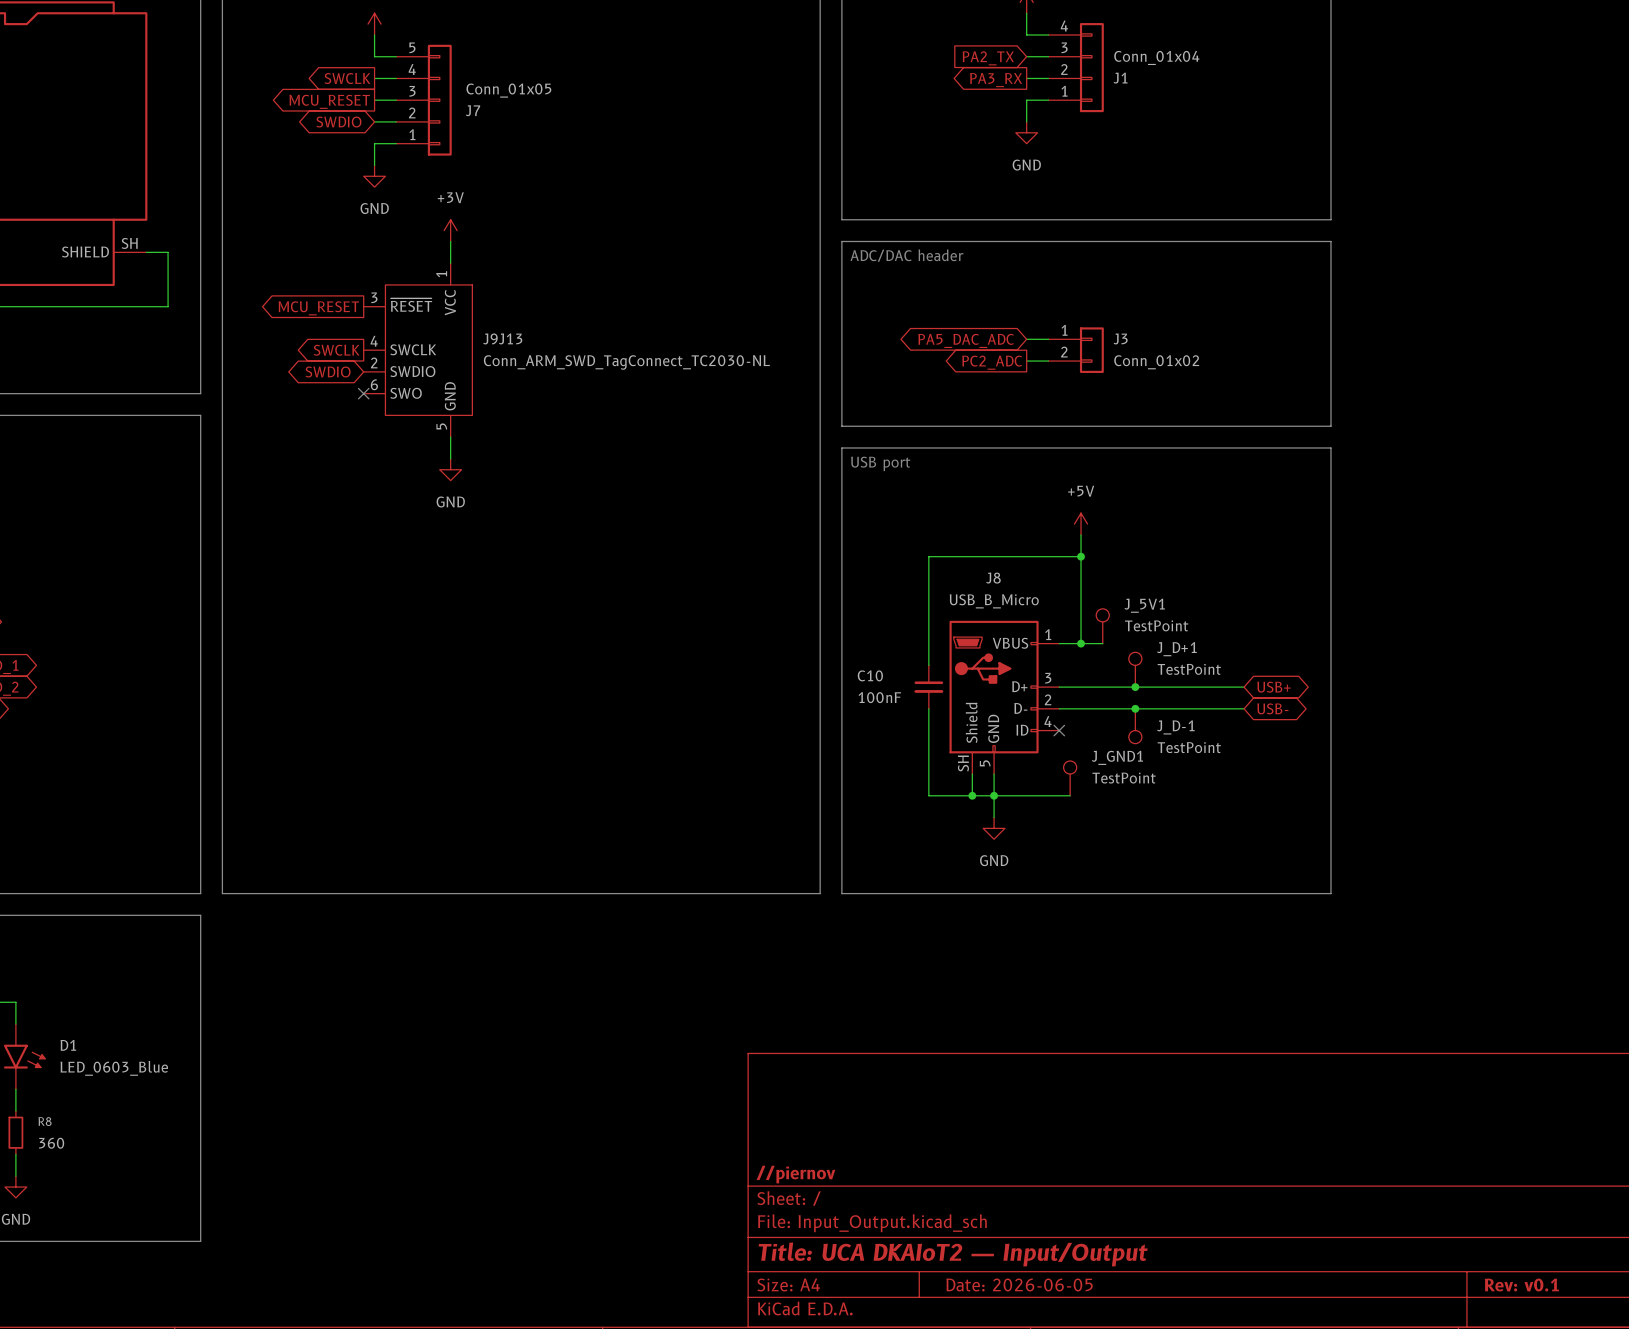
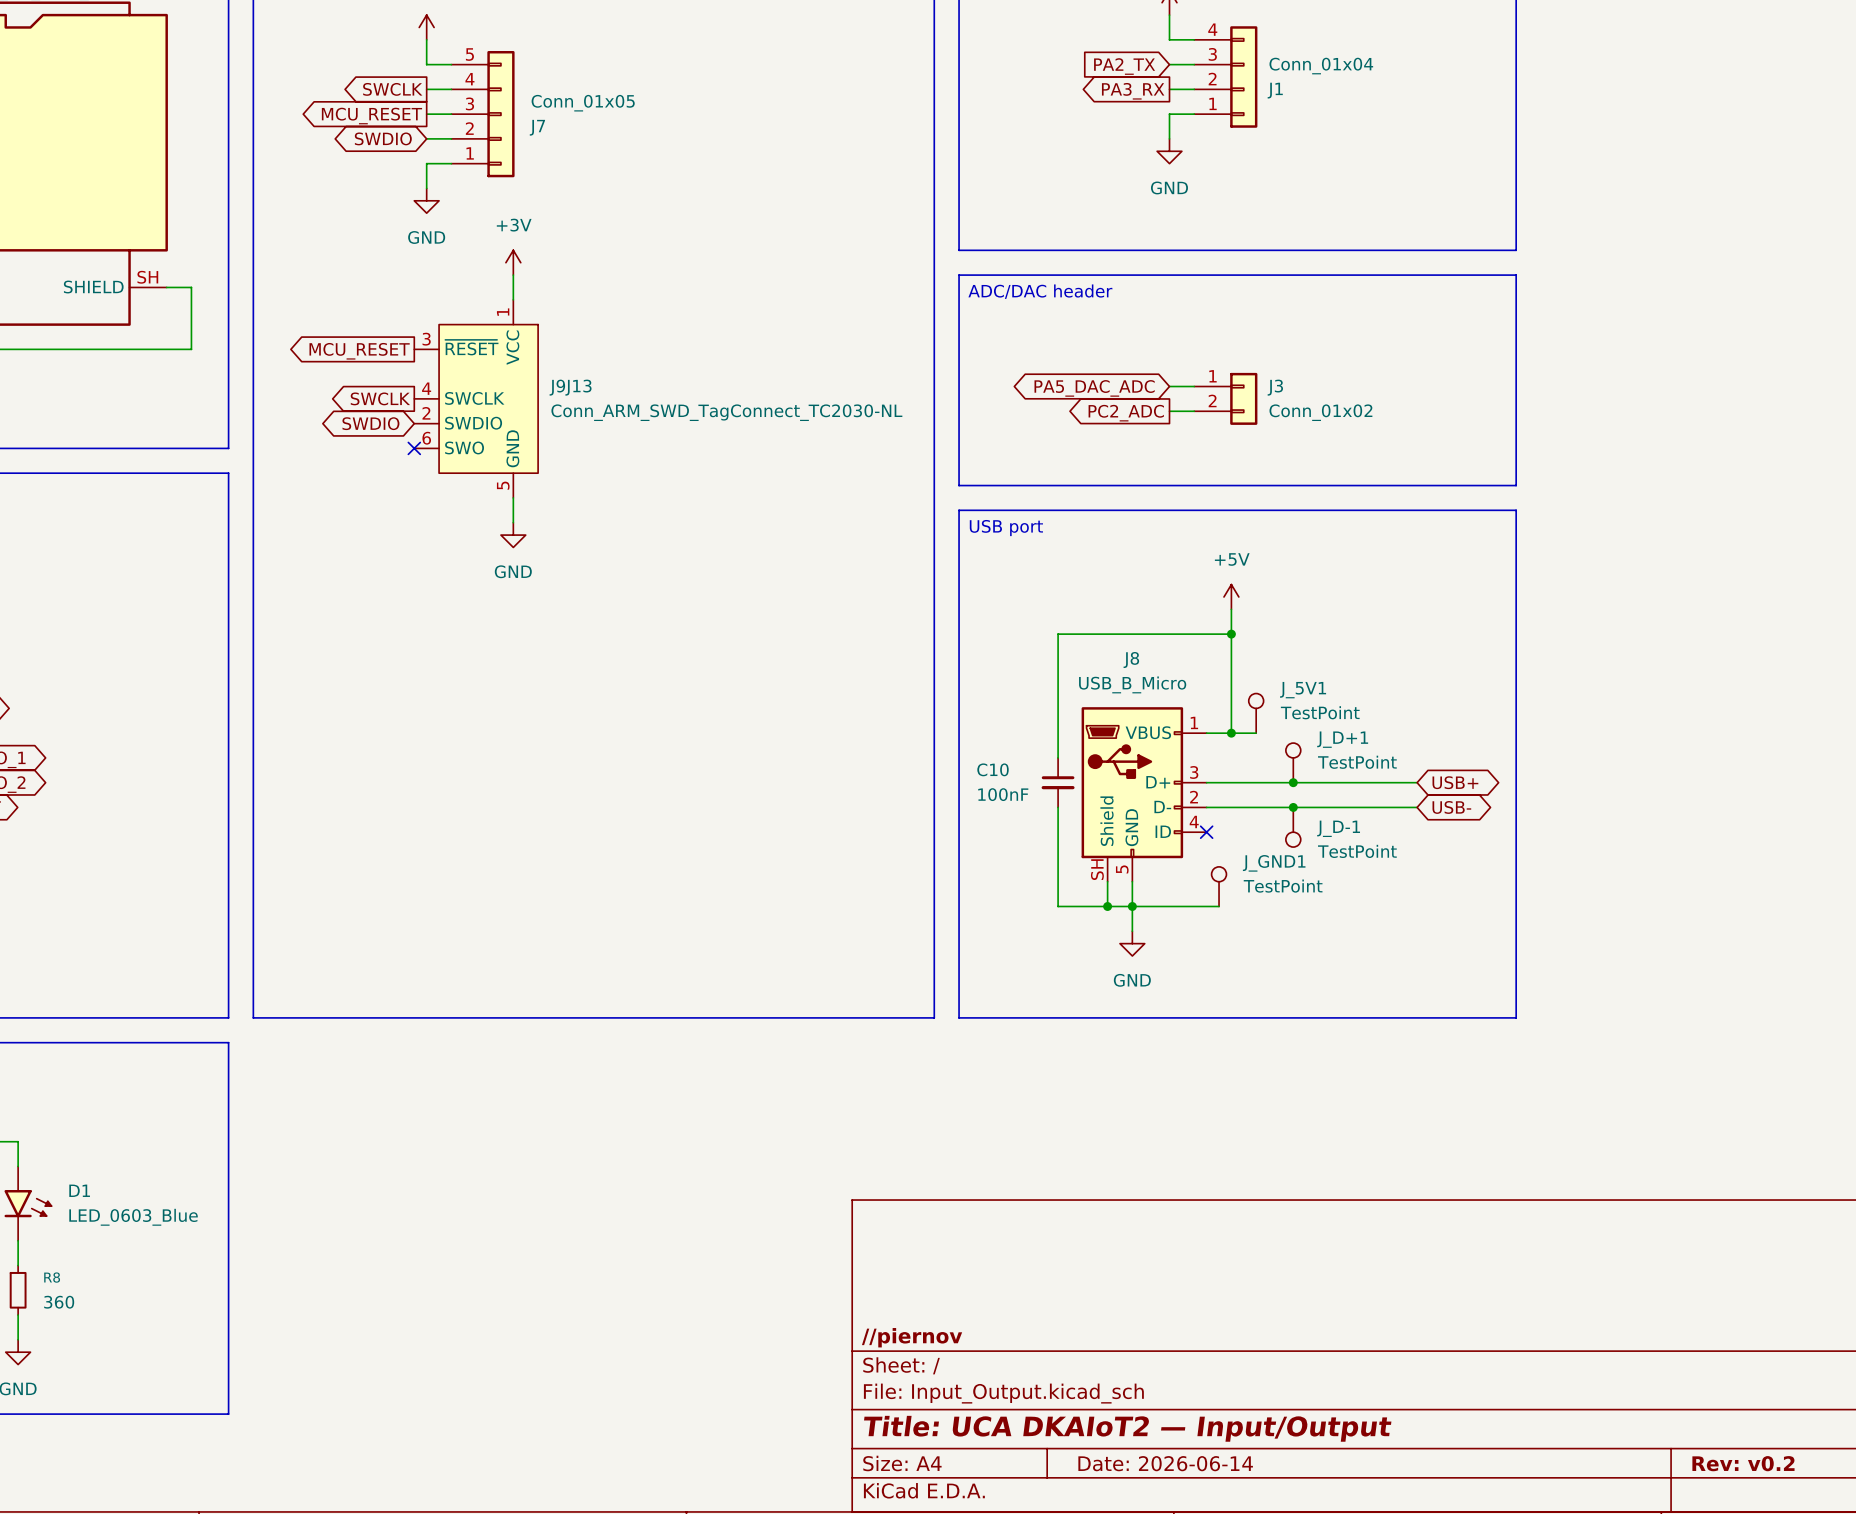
title block: Date: 2026-06-05 (1019, 1284) -> Date: 2026-06-14 (1165, 1463)
title block: Rev: v0.1 (1521, 1285) -> Rev: v0.2 (1743, 1463)

